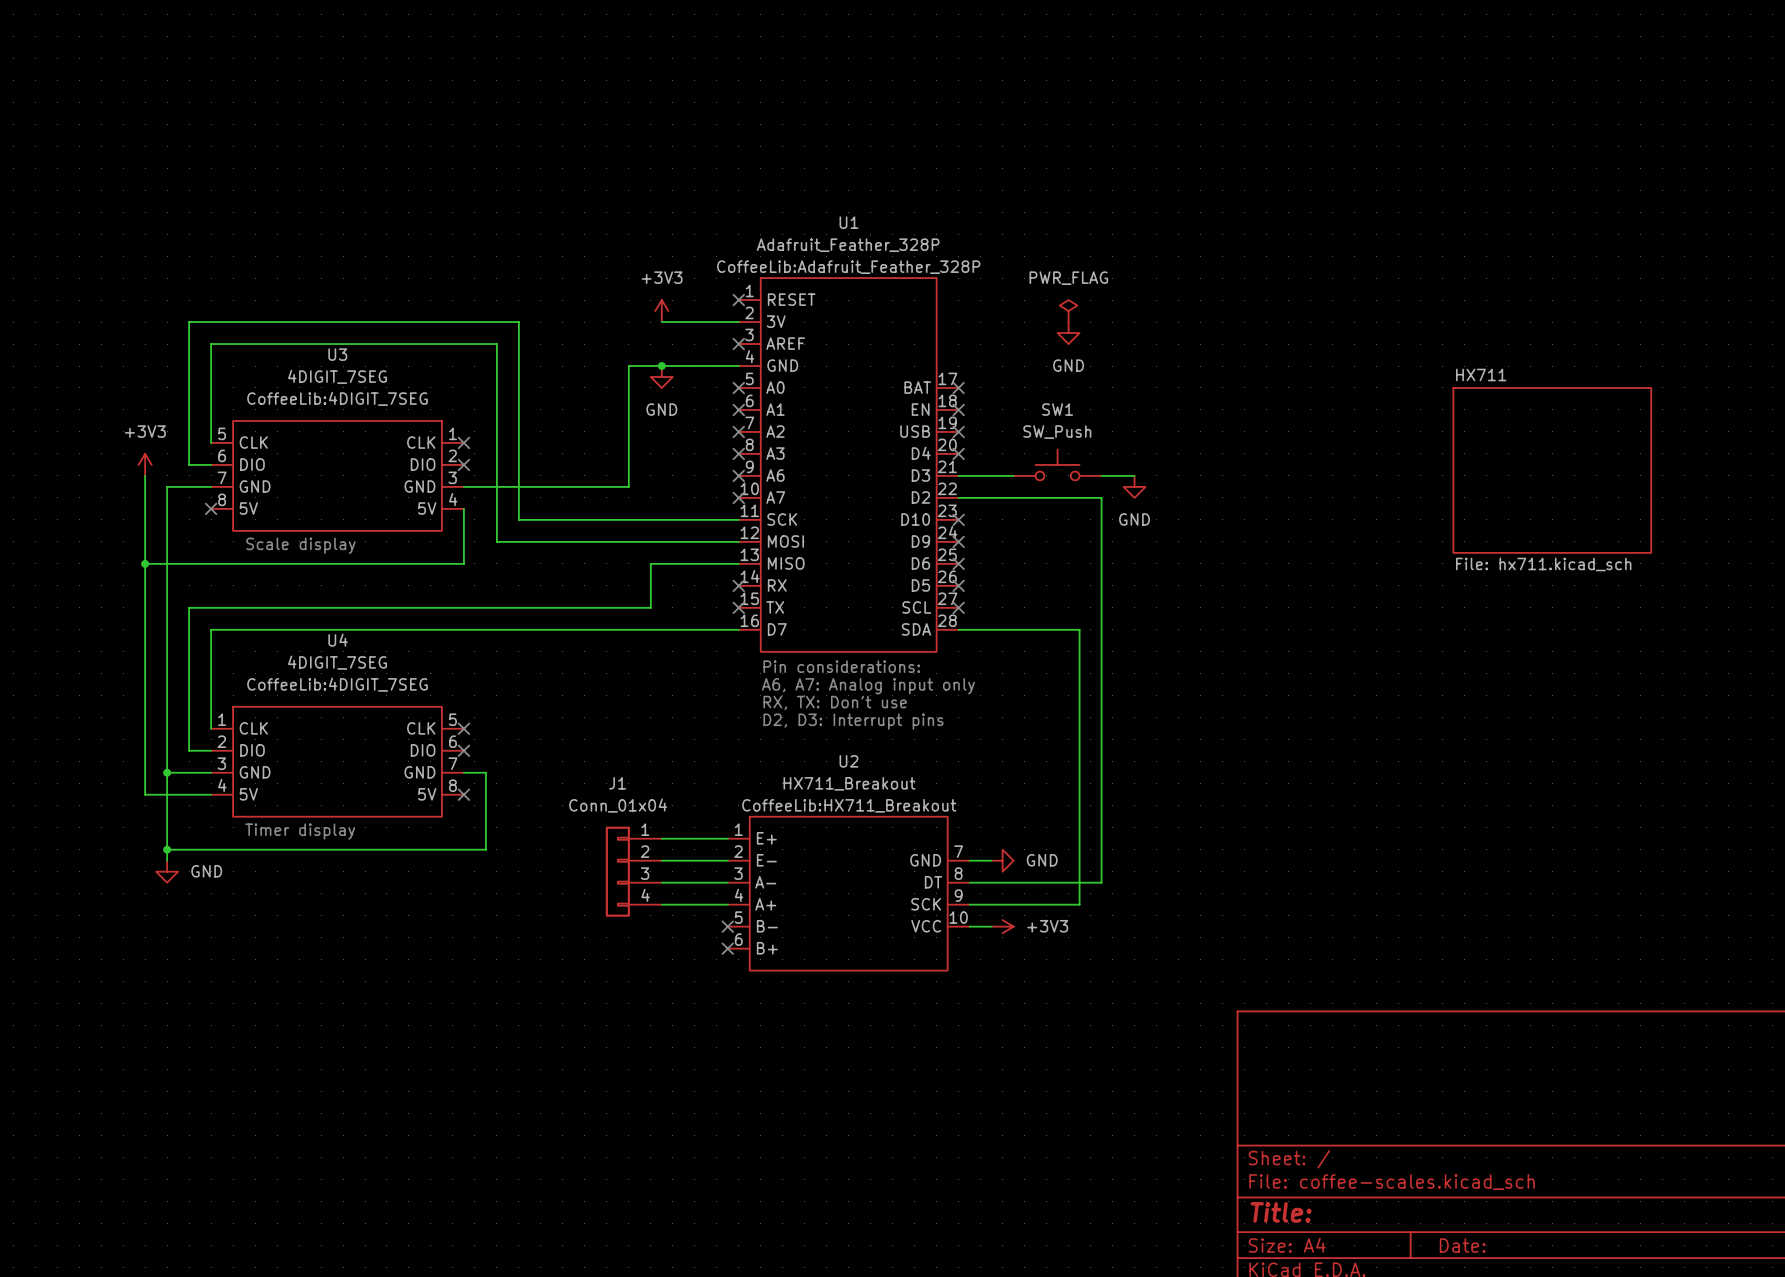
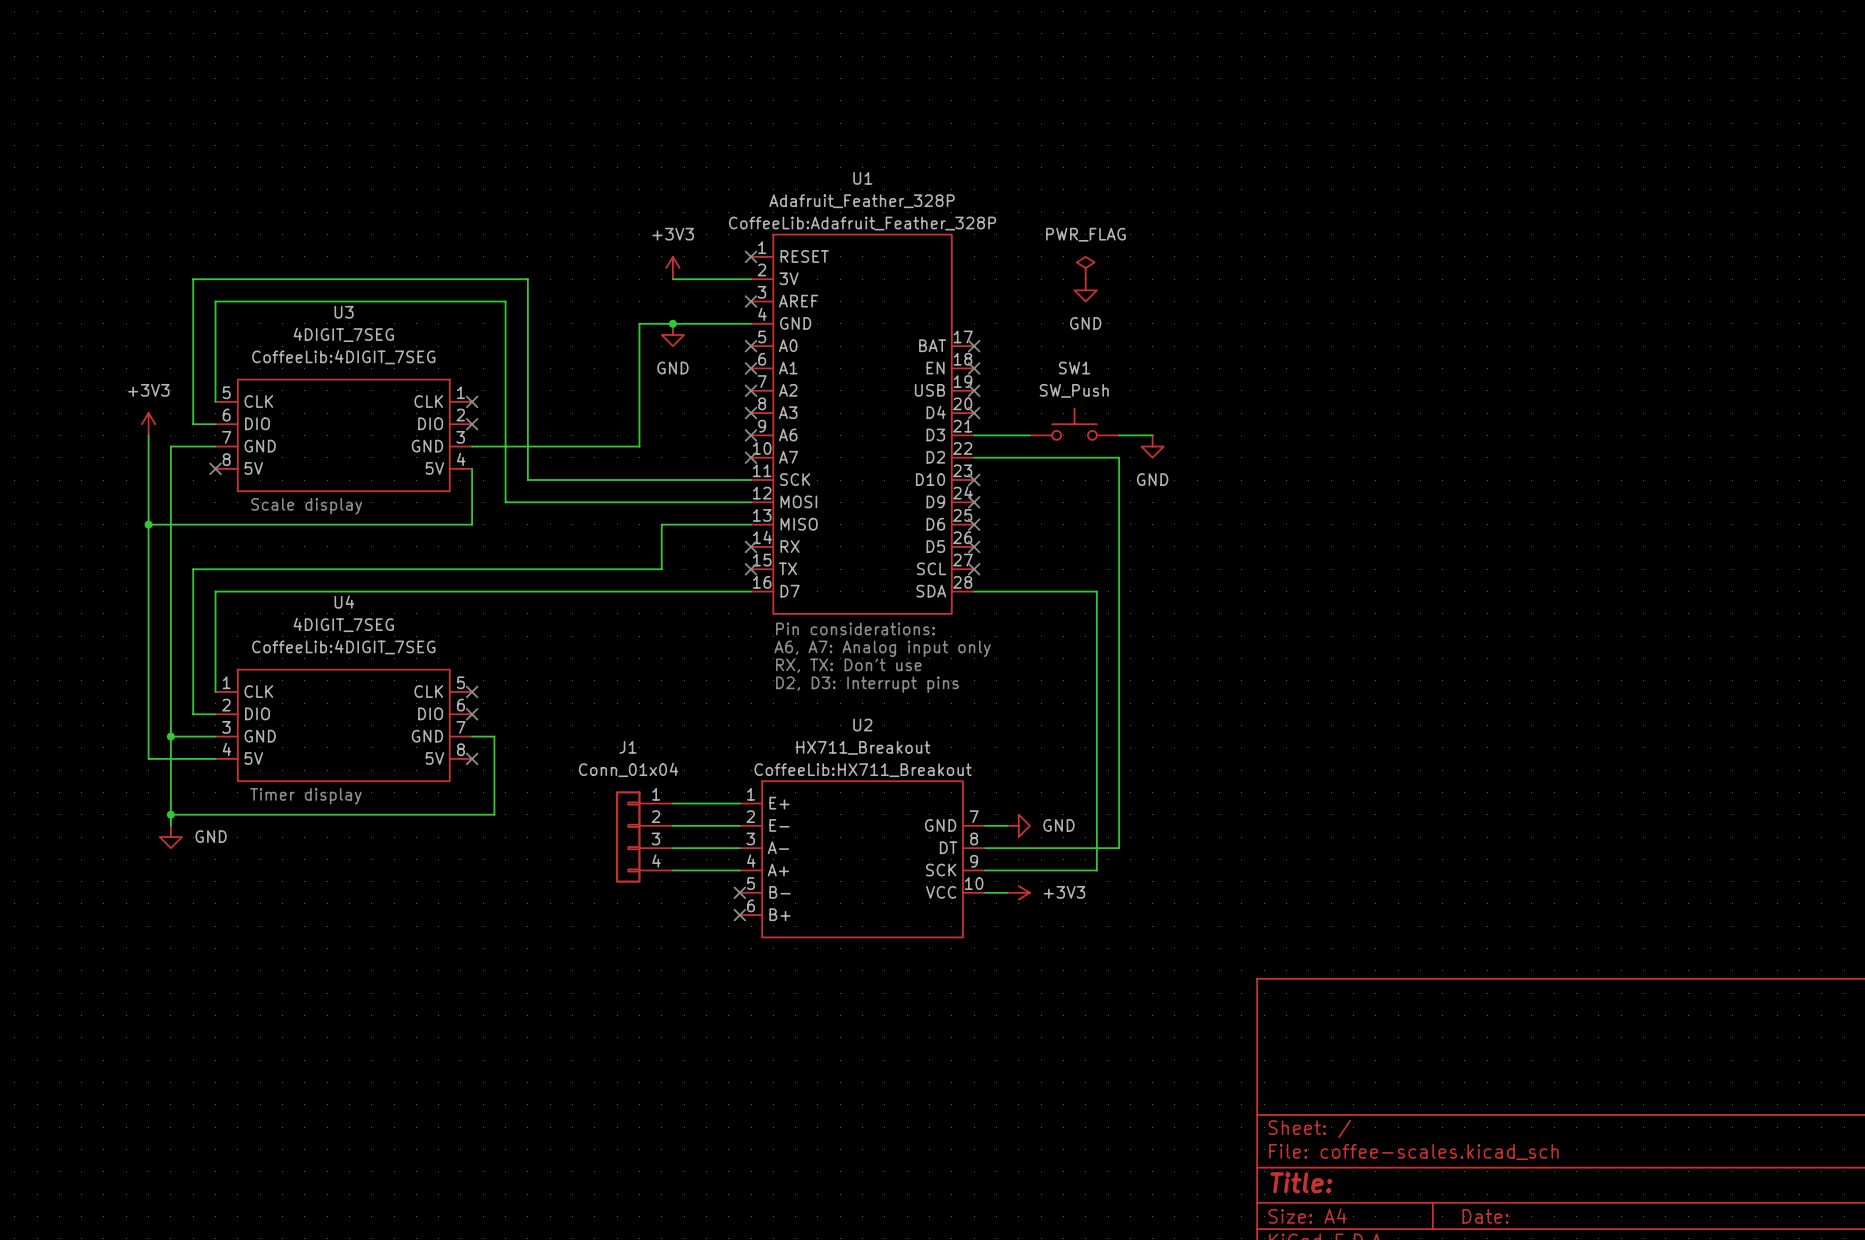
sheet HX711: File: hx711.kicad_sch (1552, 470) -> none

